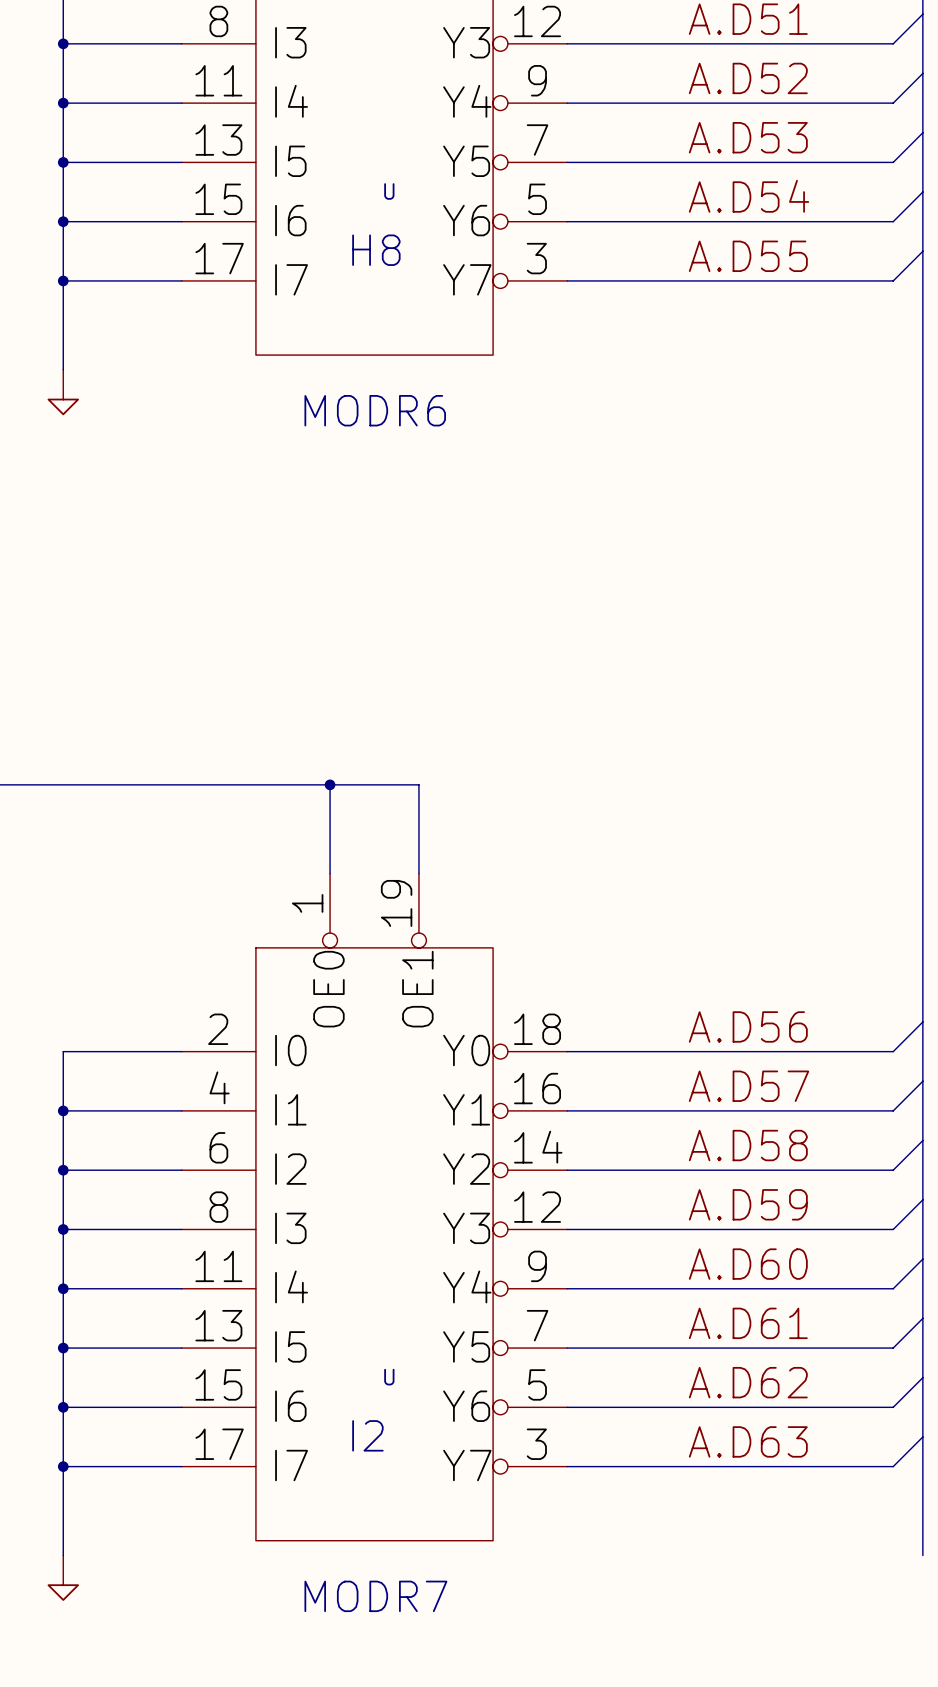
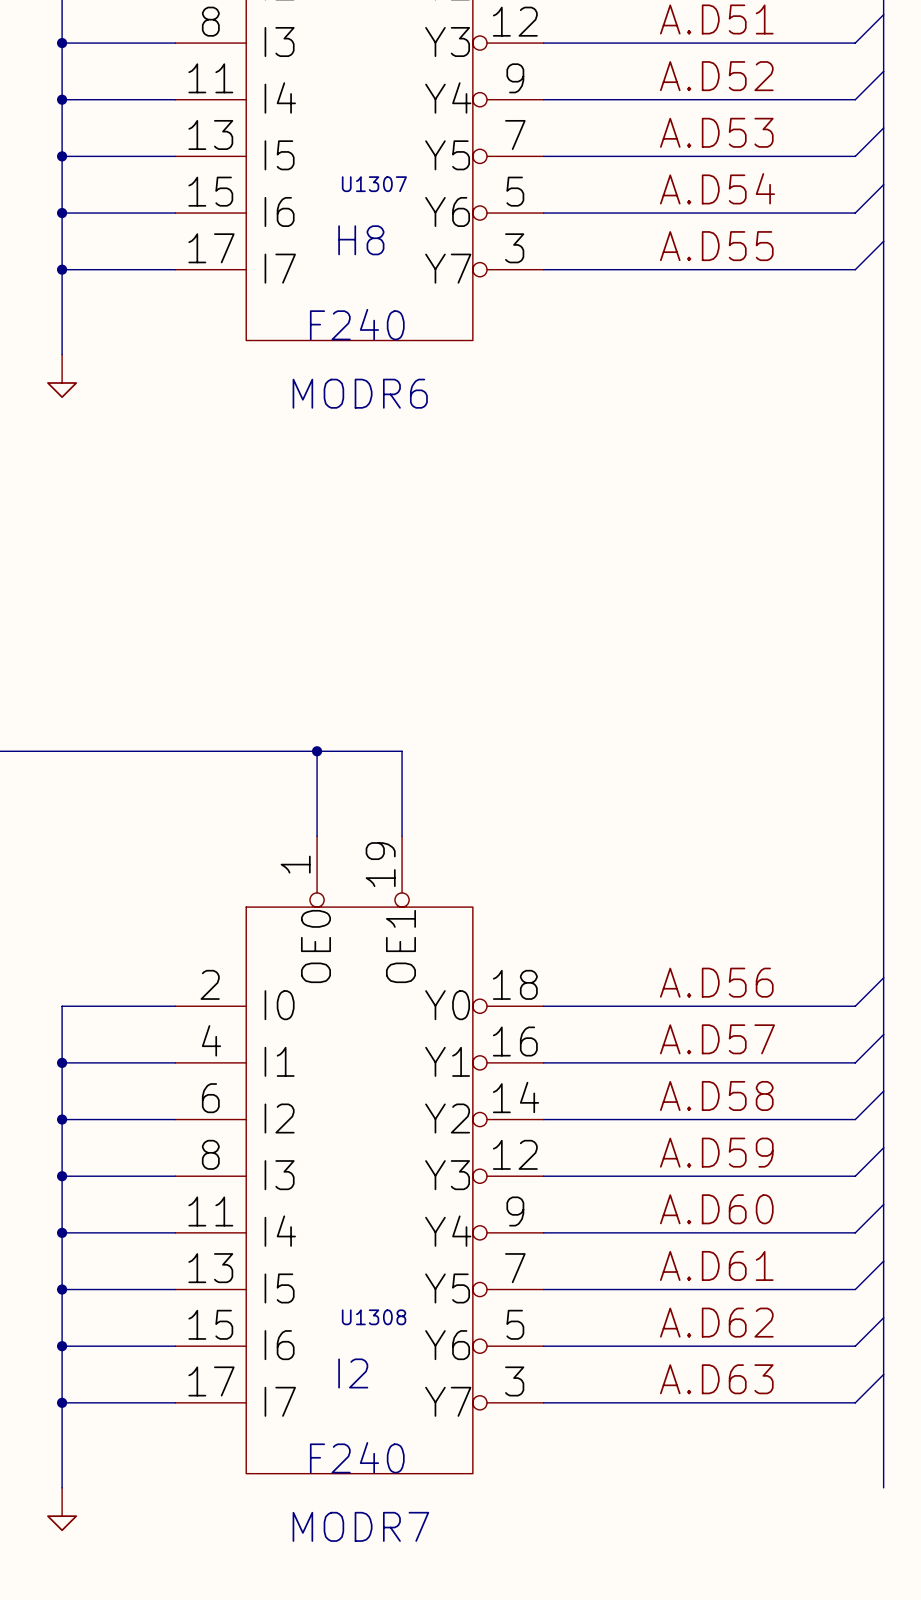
U name: U (389, 191) -> U1307 (374, 184)
U value: none -> F240 (357, 324)
U name: U (389, 1377) -> U1308 (374, 1317)
U value: none -> F240 (357, 1457)

